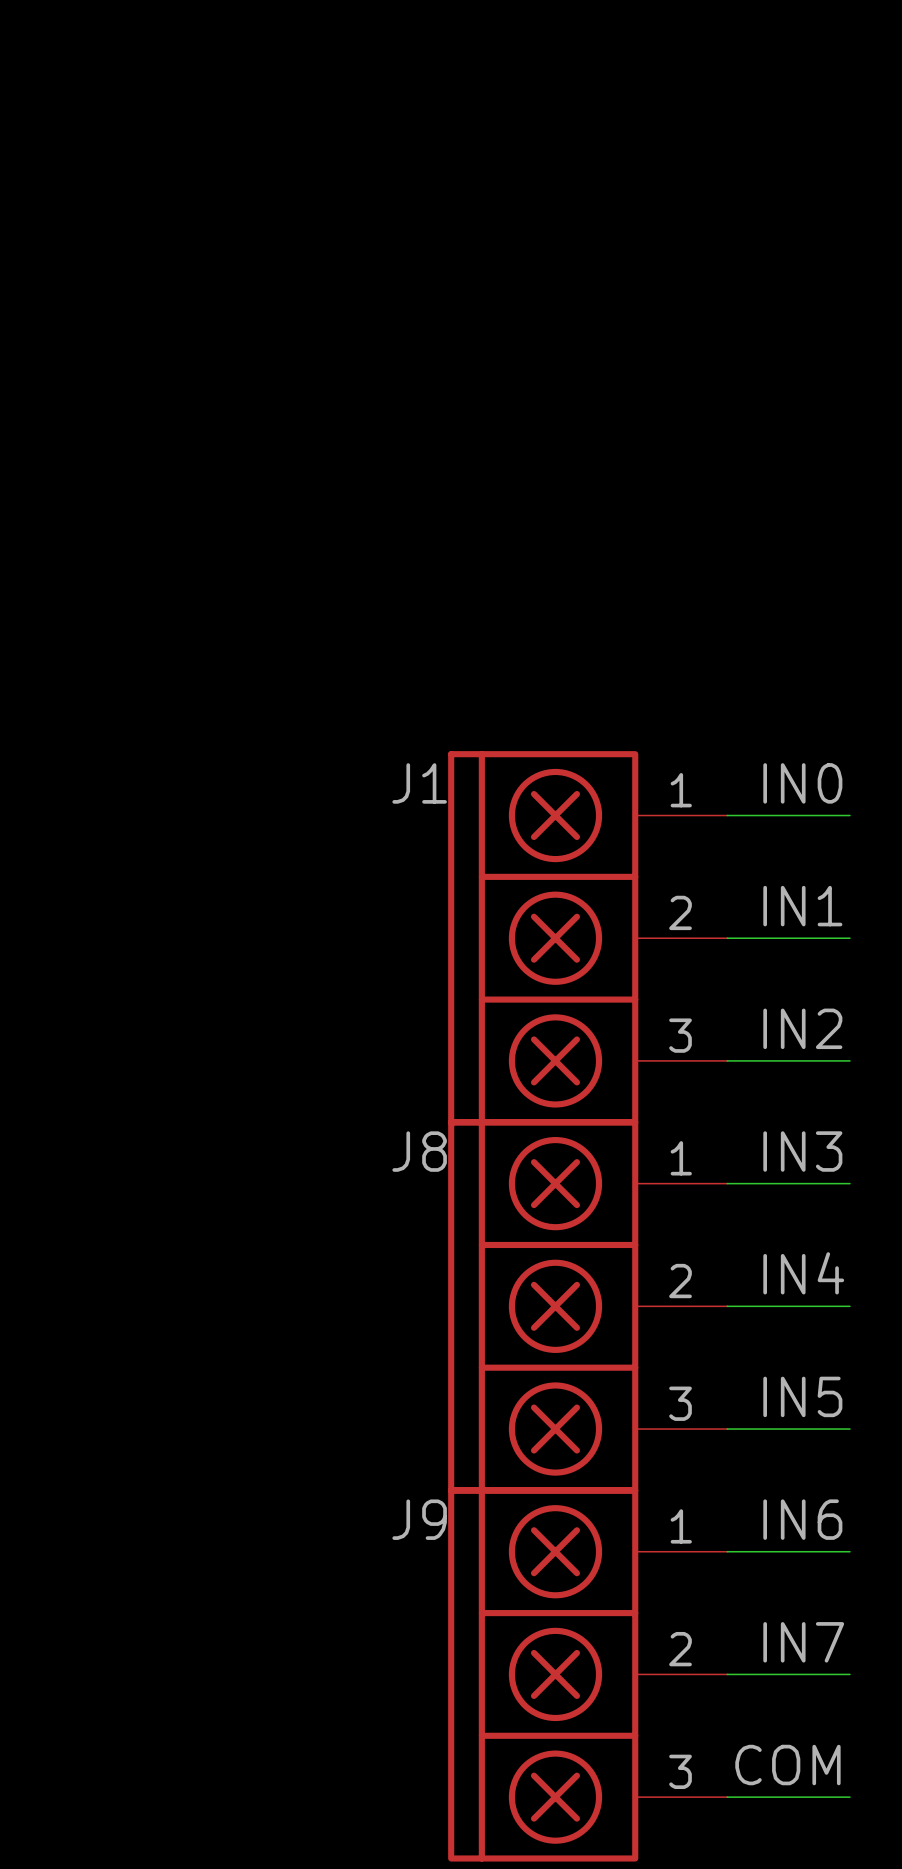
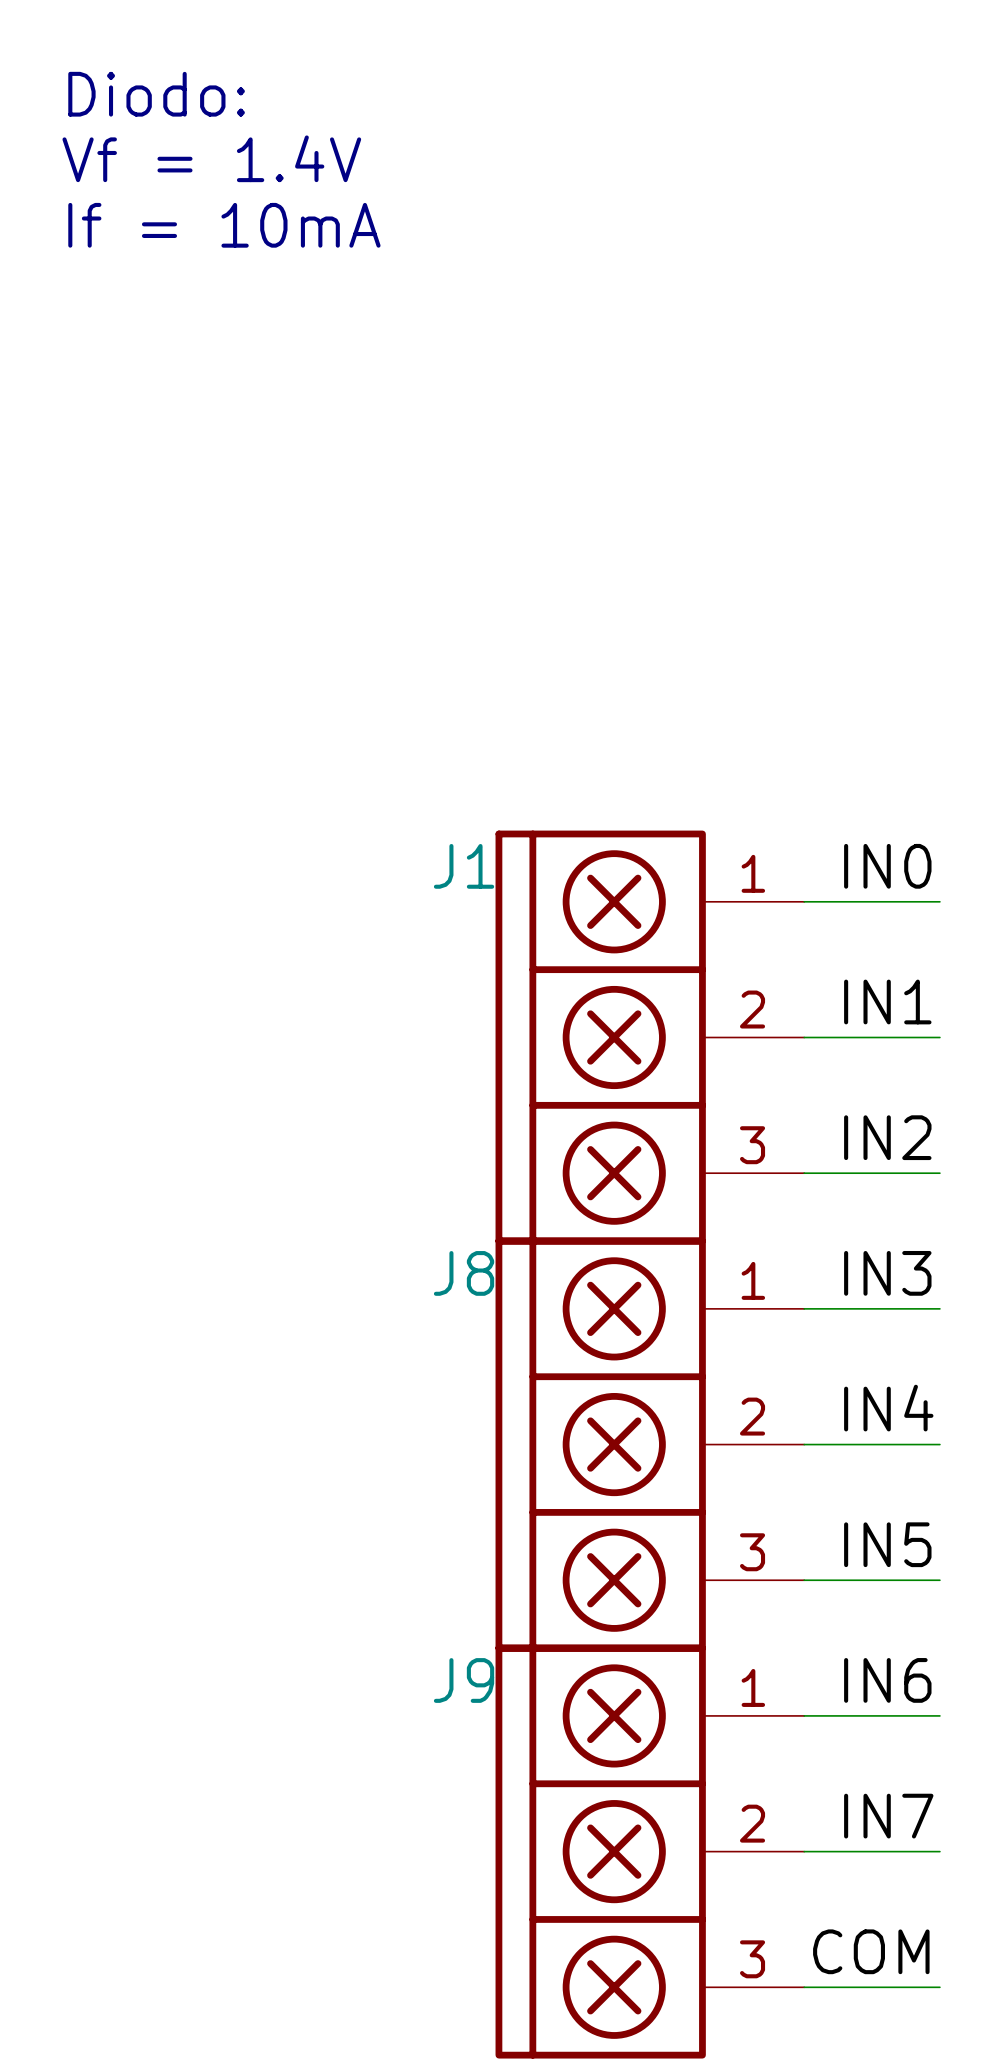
text: none -> Diodo: (156, 94)
text: none -> Vf = 1.4V (211, 158)
text: none -> If = 10mA (224, 225)

